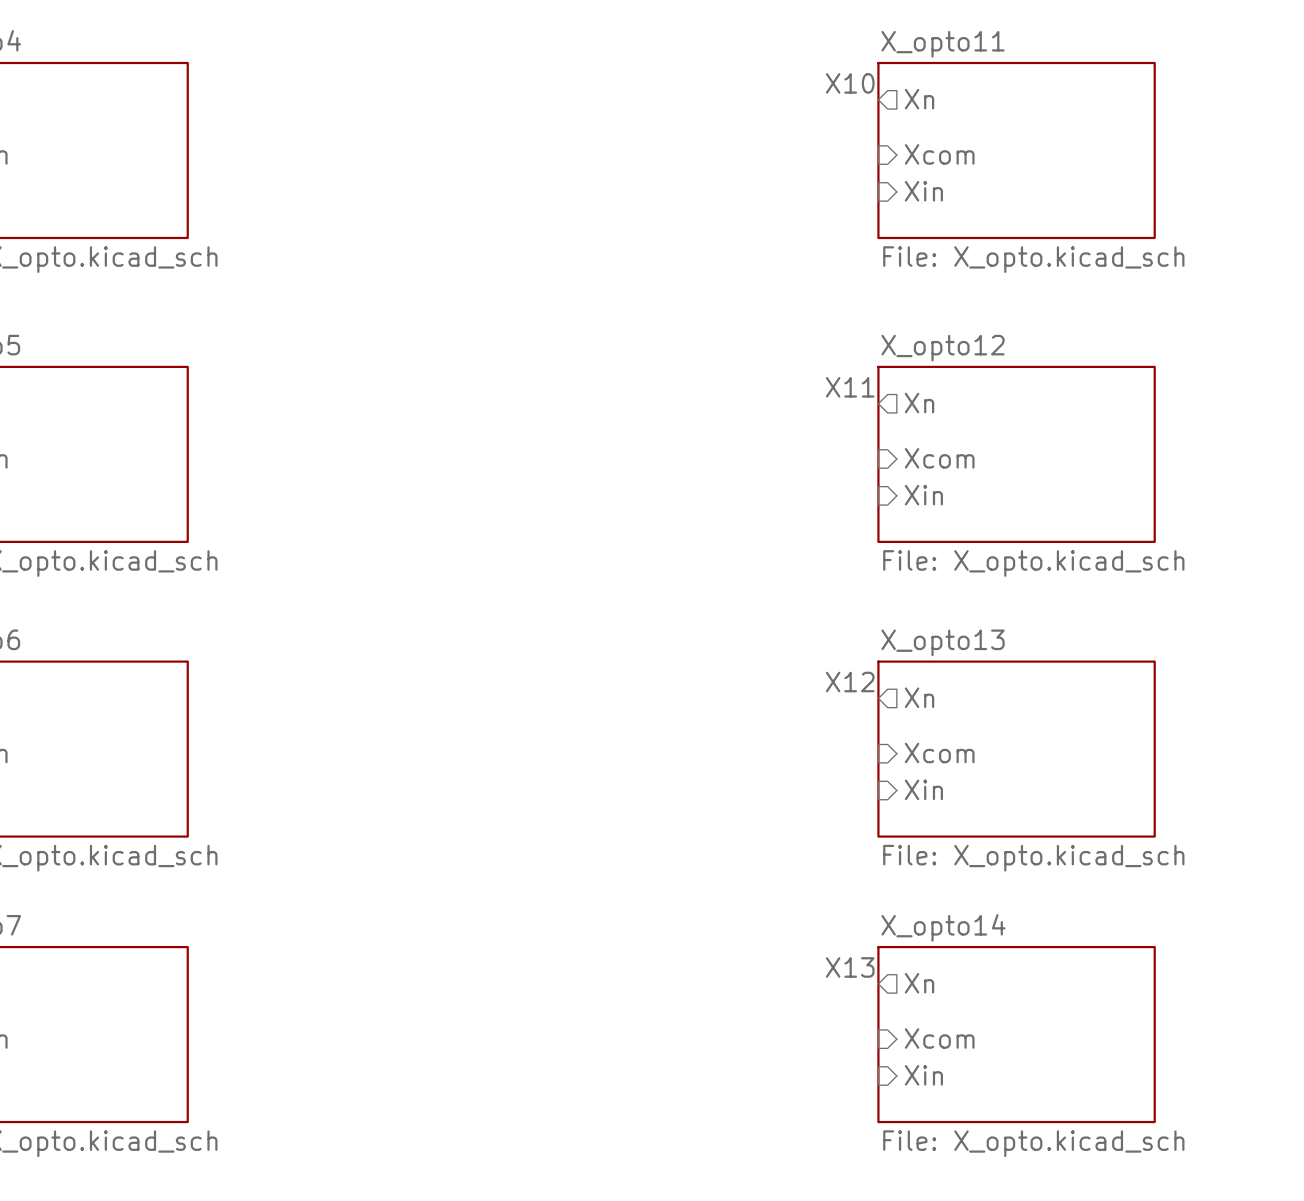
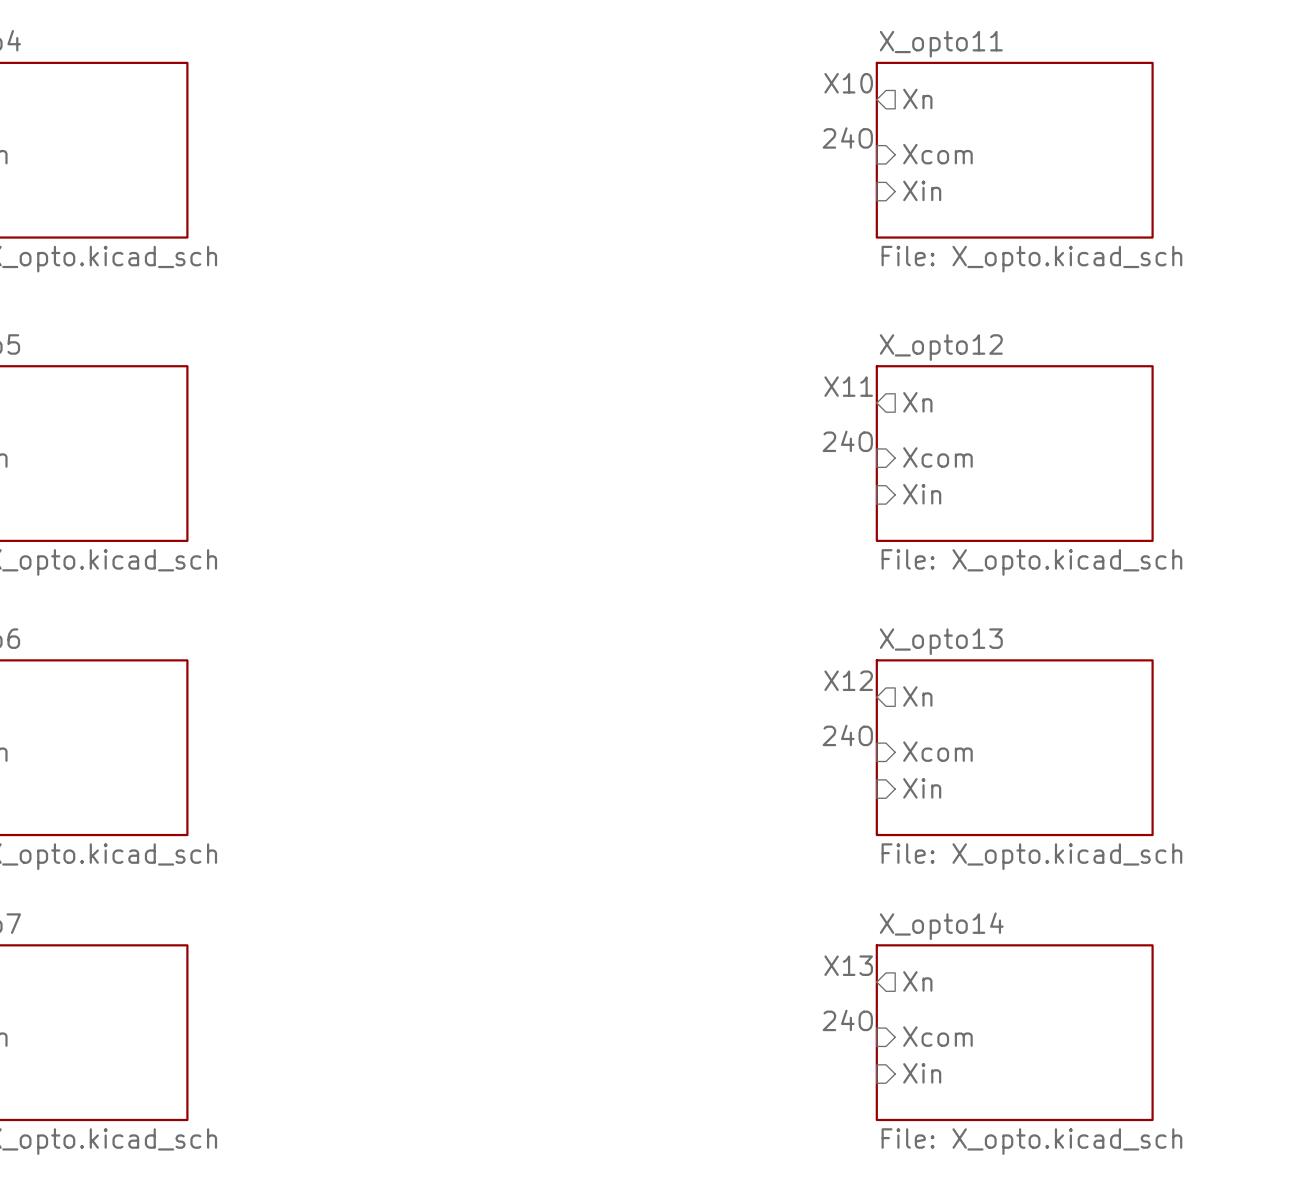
label: none -> 24O (847, 137)
label: none -> 24O (847, 441)
label: none -> 24O (847, 735)
label: none -> 24O (847, 1020)

